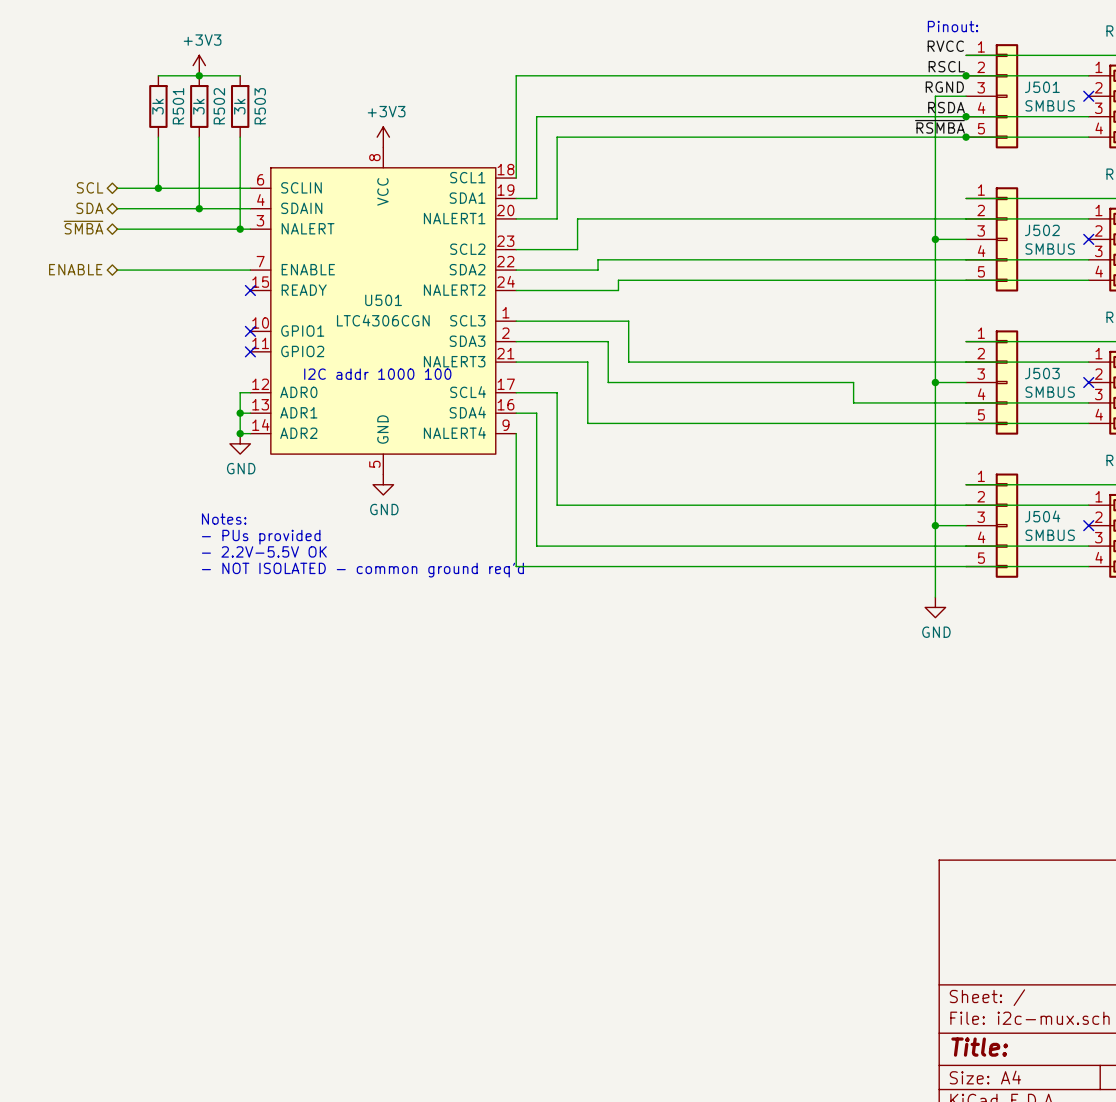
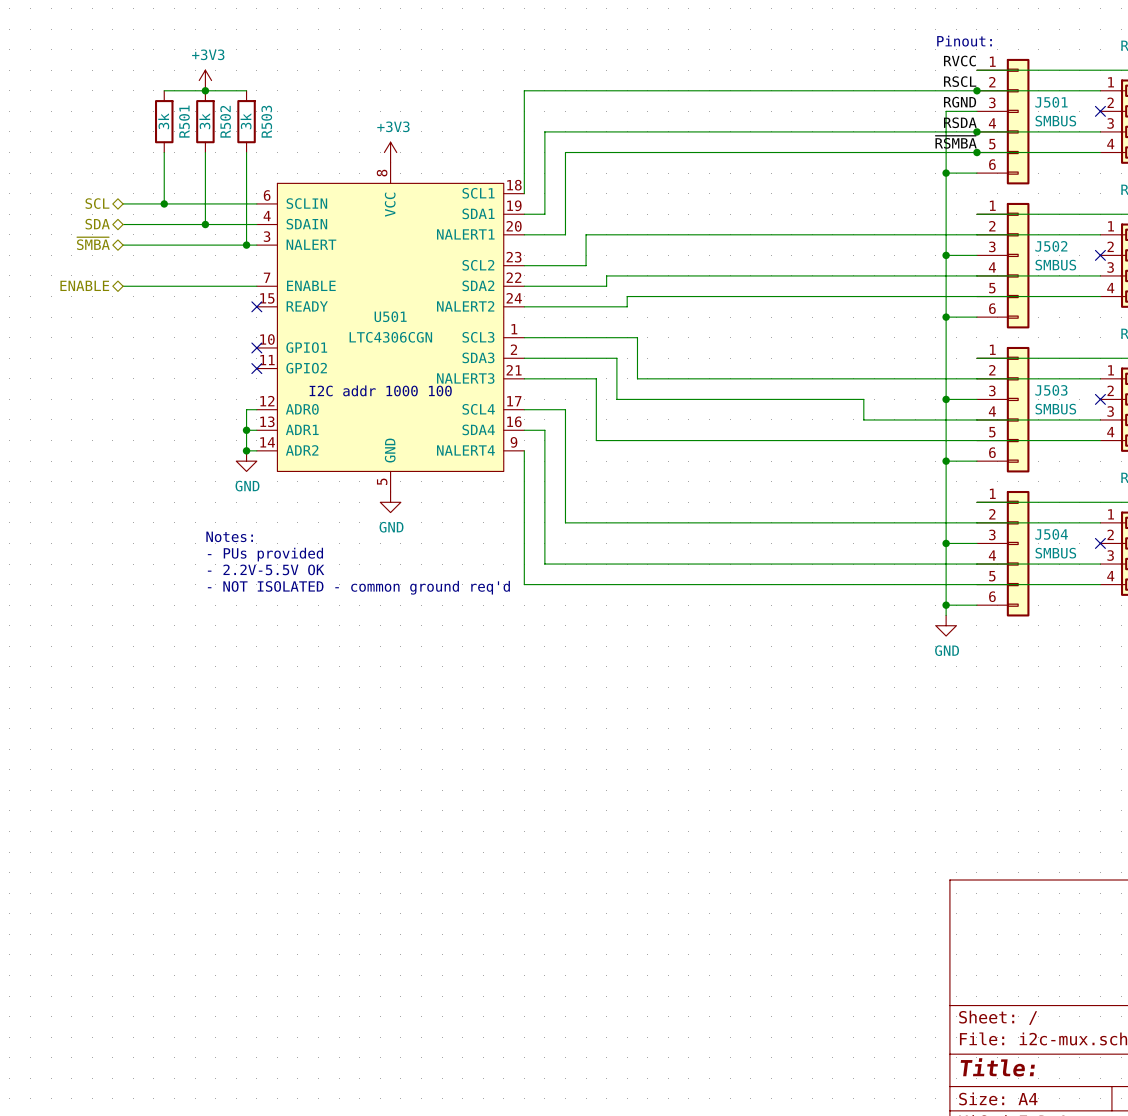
J501 symbol: [966, 44, 1019, 149] -> [976, 58, 1030, 185]
wire: none -> (946, 173) (976, 173)
junction: none -> (946, 173)
J502 symbol: [966, 187, 1019, 292] -> [976, 202, 1030, 329]
wire: none -> (946, 317) (976, 317)
junction: none -> (946, 317)
J503 symbol: [966, 330, 1019, 435] -> [976, 346, 1030, 473]
wire: none -> (946, 461) (976, 461)
junction: none -> (946, 461)
J504 symbol: [966, 473, 1019, 578] -> [976, 490, 1030, 617]
wire: none -> (946, 605) (976, 605)
junction: none -> (946, 605)

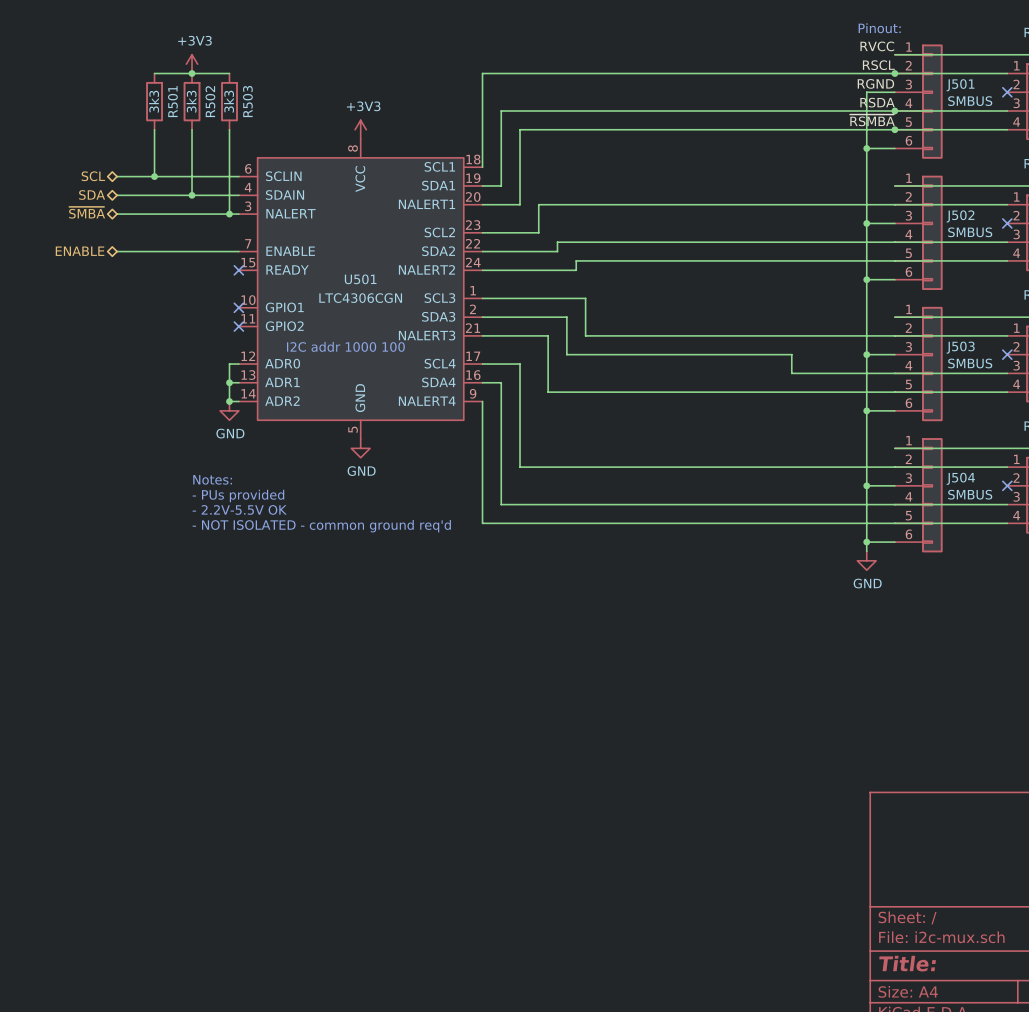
R501 value: 3k (163, 121) -> 3k3 (154, 101)
R502 value: 3k (204, 121) -> 3k3 (191, 101)
R503 value: 3k (246, 121) -> 3k3 (229, 101)

